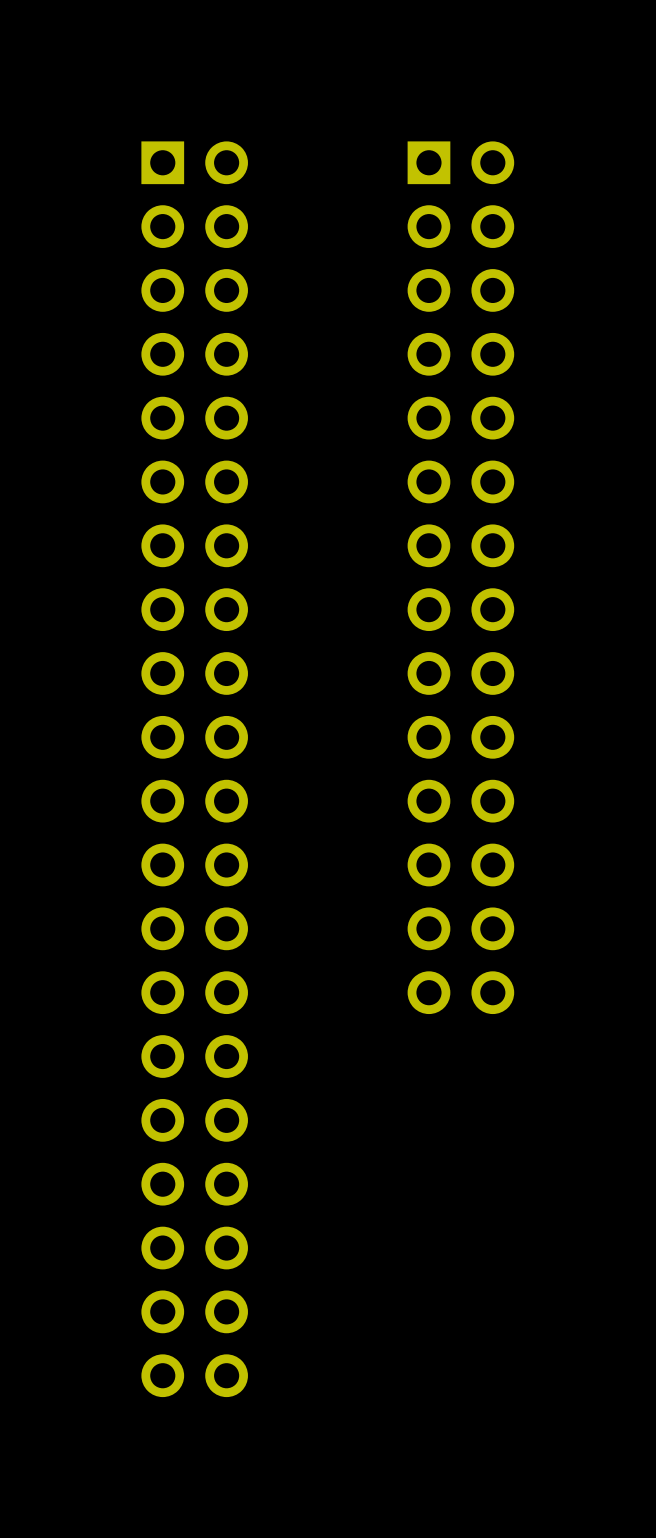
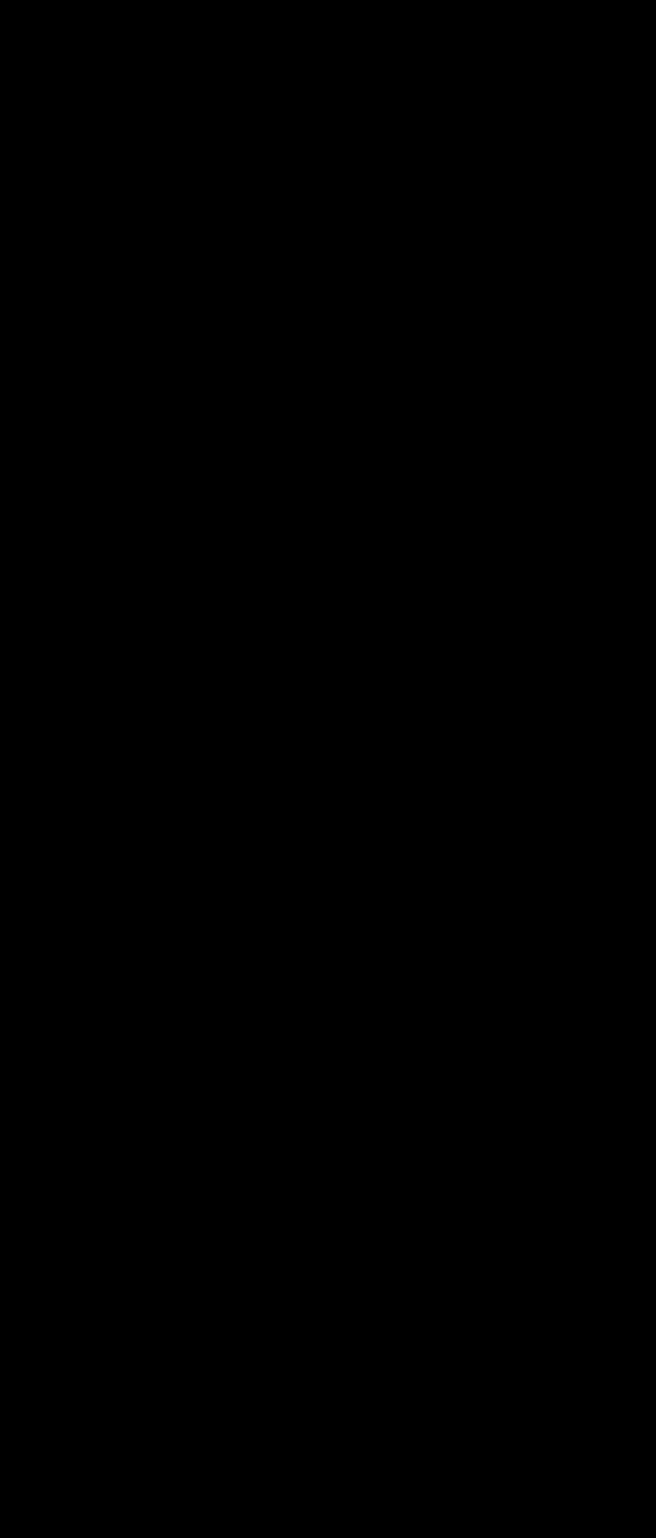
part: (460, 577) -> none
part: (194, 769) -> none

